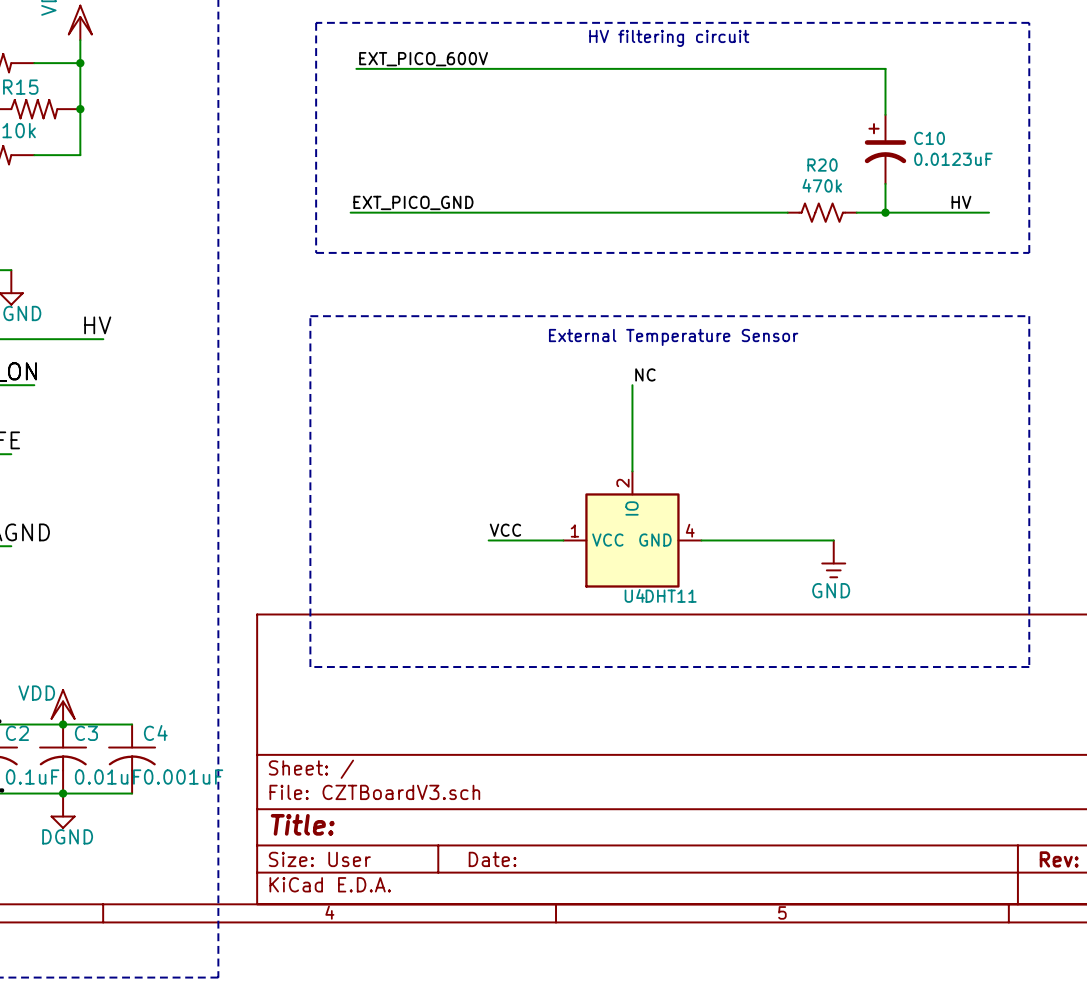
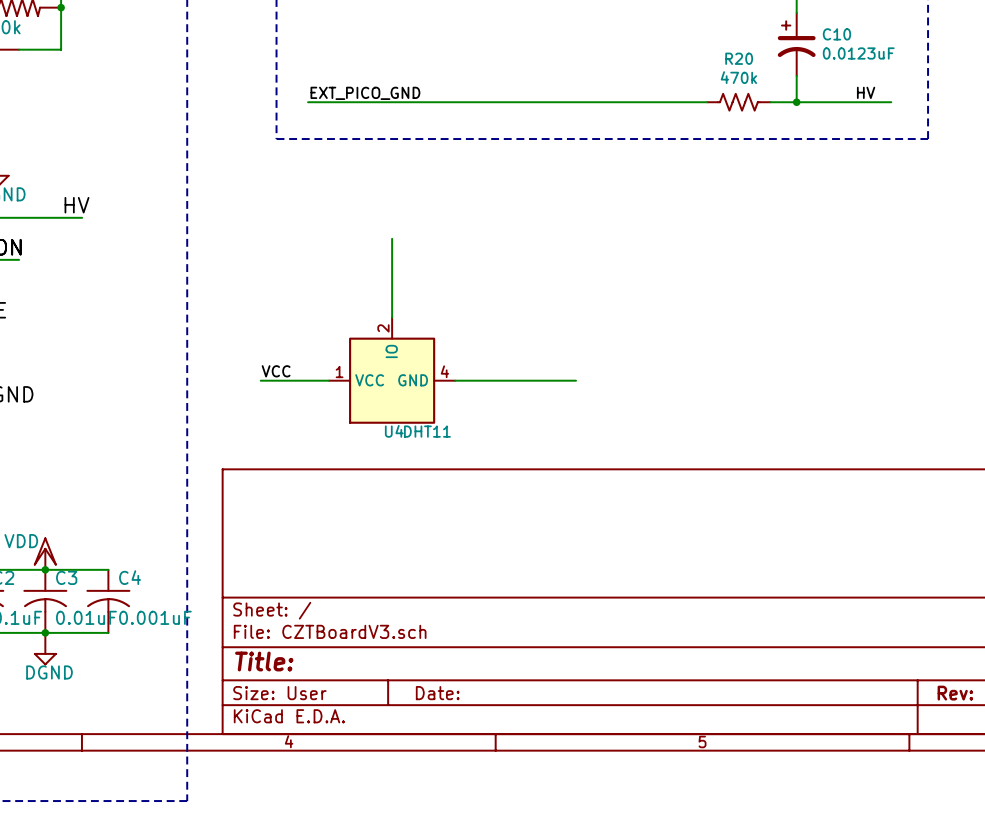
line: (310, 316) (310, 667) (1029, 667) (1029, 316) (310, 316) -> none
text: External Temperature Sensor (673, 337) -> none
label: NC (645, 374) -> none
wire: (632, 385) (632, 471) -> (392, 238) (392, 317)
U4 position: (632, 529) -> (392, 370)
label position: VCC (505, 530) -> VCC (276, 371)
wire: (488, 540) (563, 540) -> (260, 380) (329, 380)
wire: (701, 540) (833, 540) -> (455, 380) (576, 380)
power symbol: GND (833, 558) -> none

